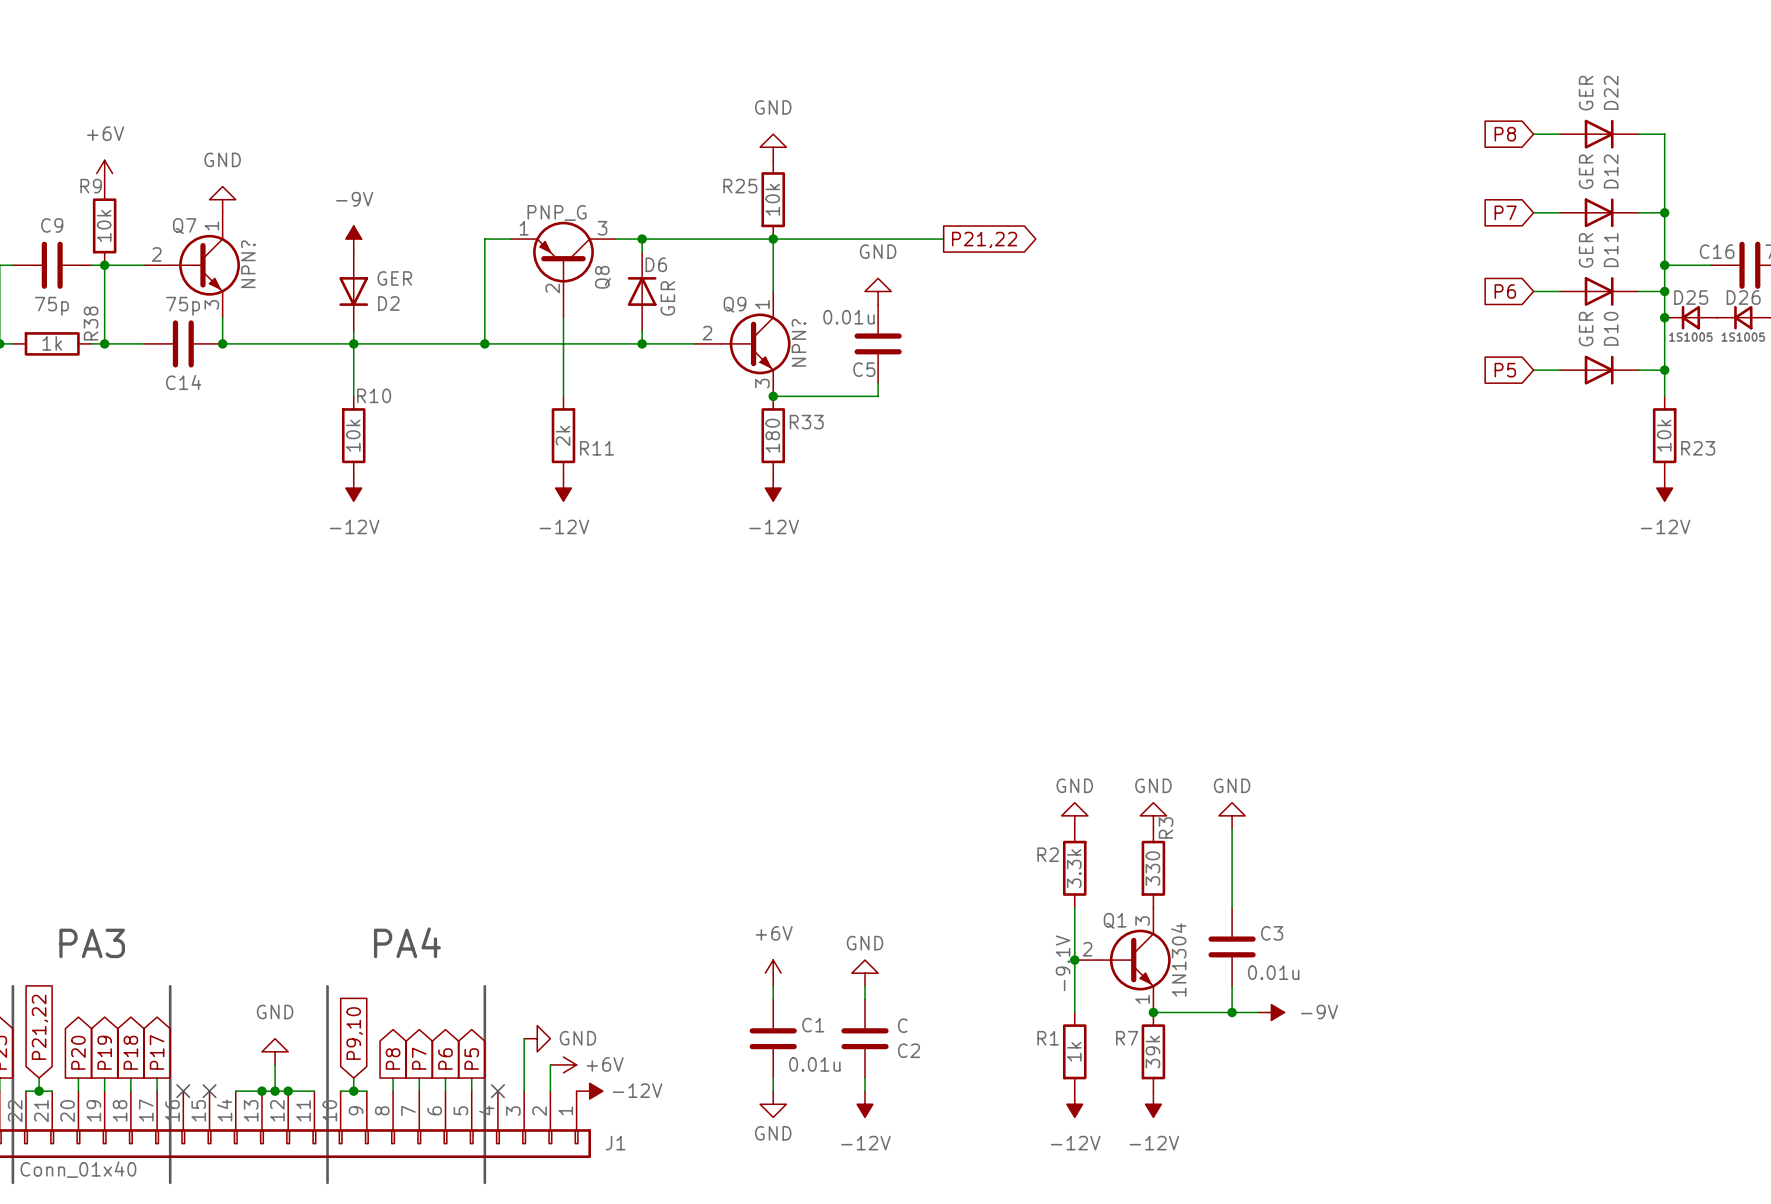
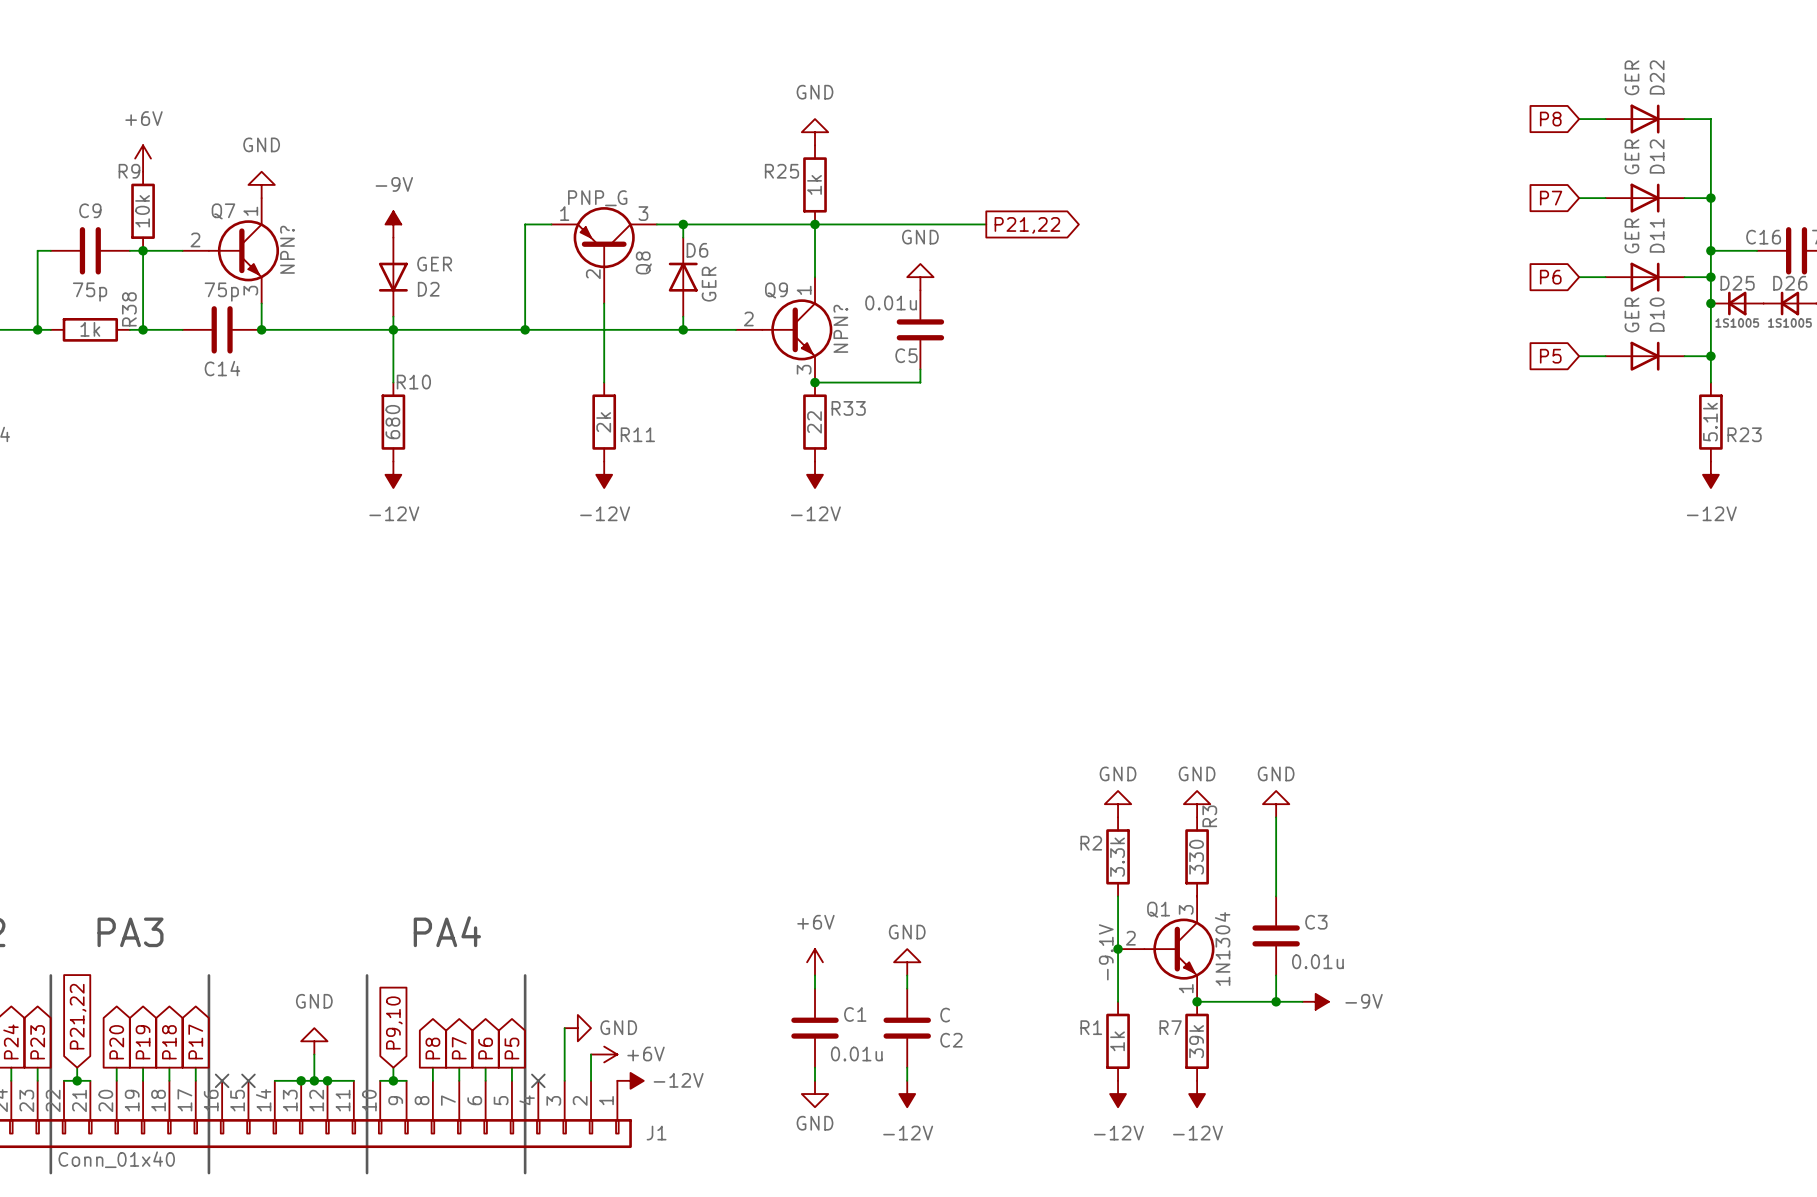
R25 value: 10k (772, 199) -> 1k (814, 184)
R10 value: 10k (353, 435) -> 680 (392, 422)
R33 value: 180 (772, 435) -> 22 (814, 422)
R23 value: 10k (1664, 435) -> 5.1k (1710, 422)

